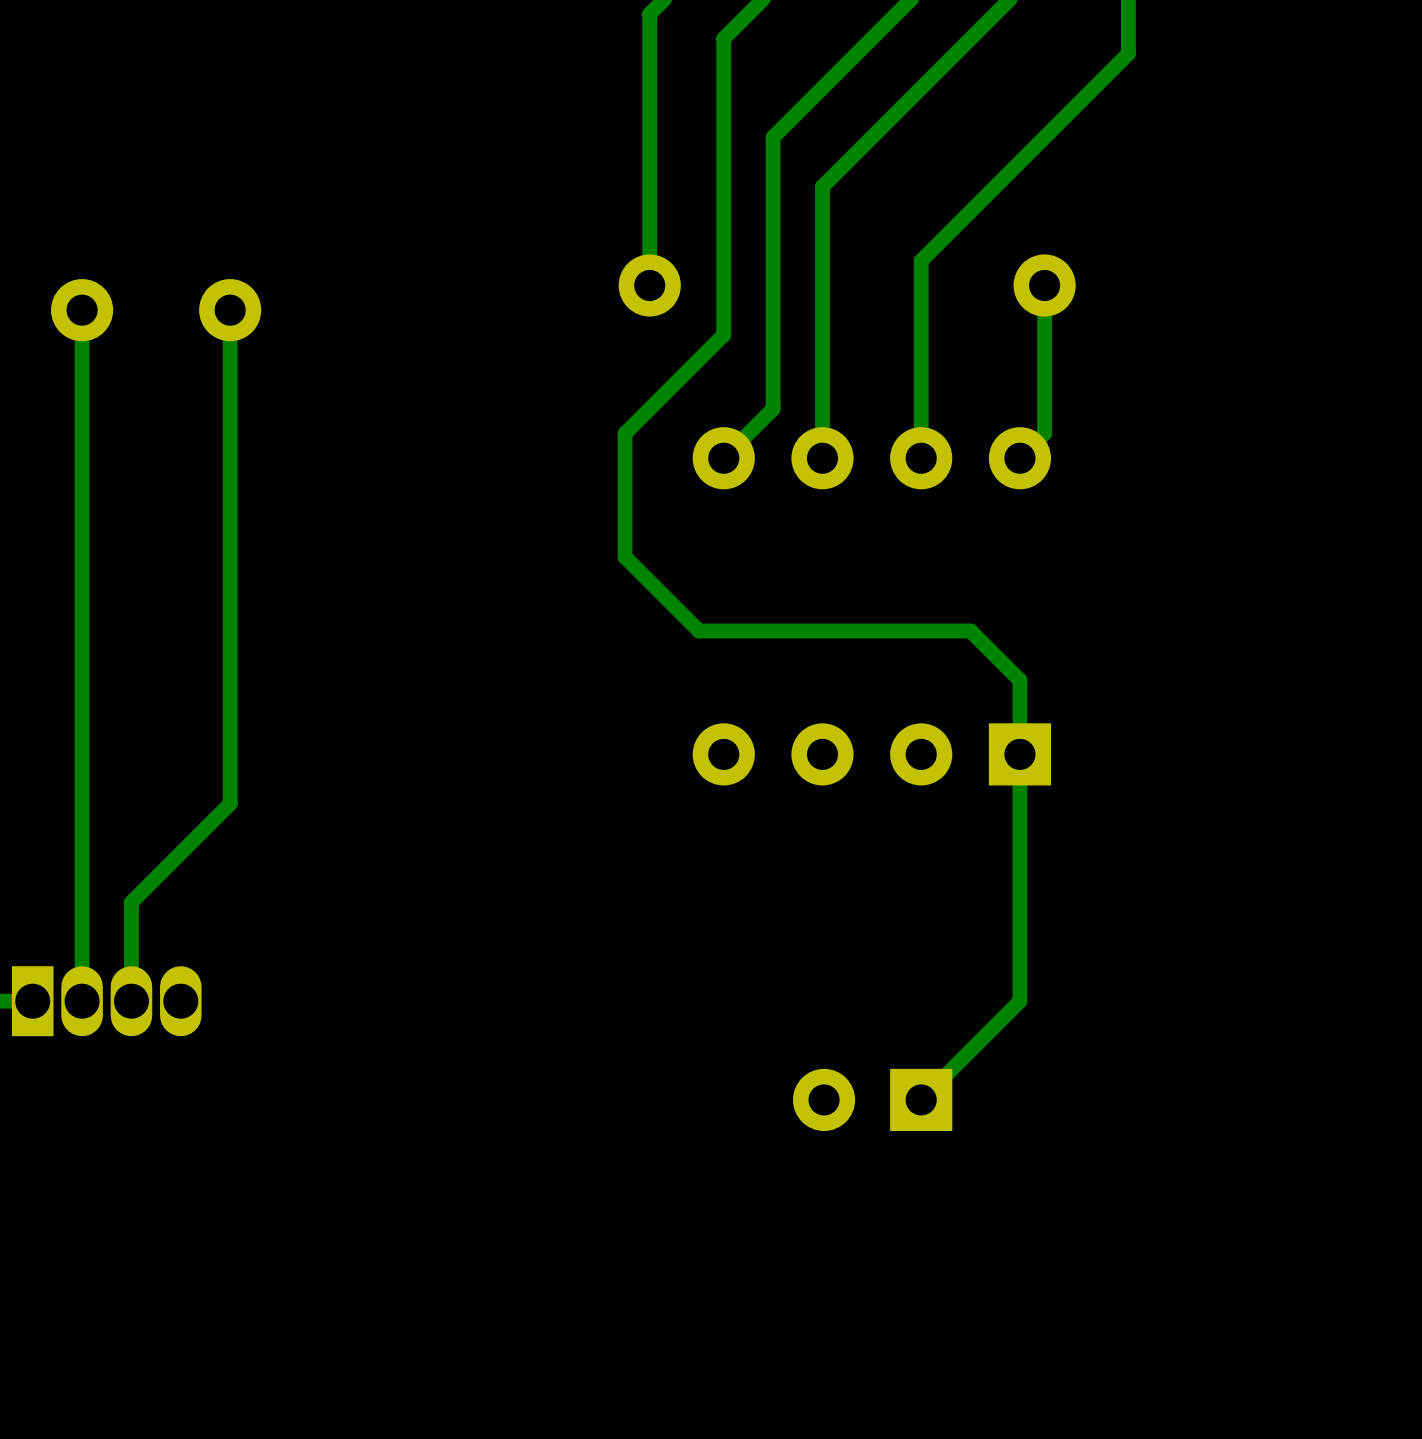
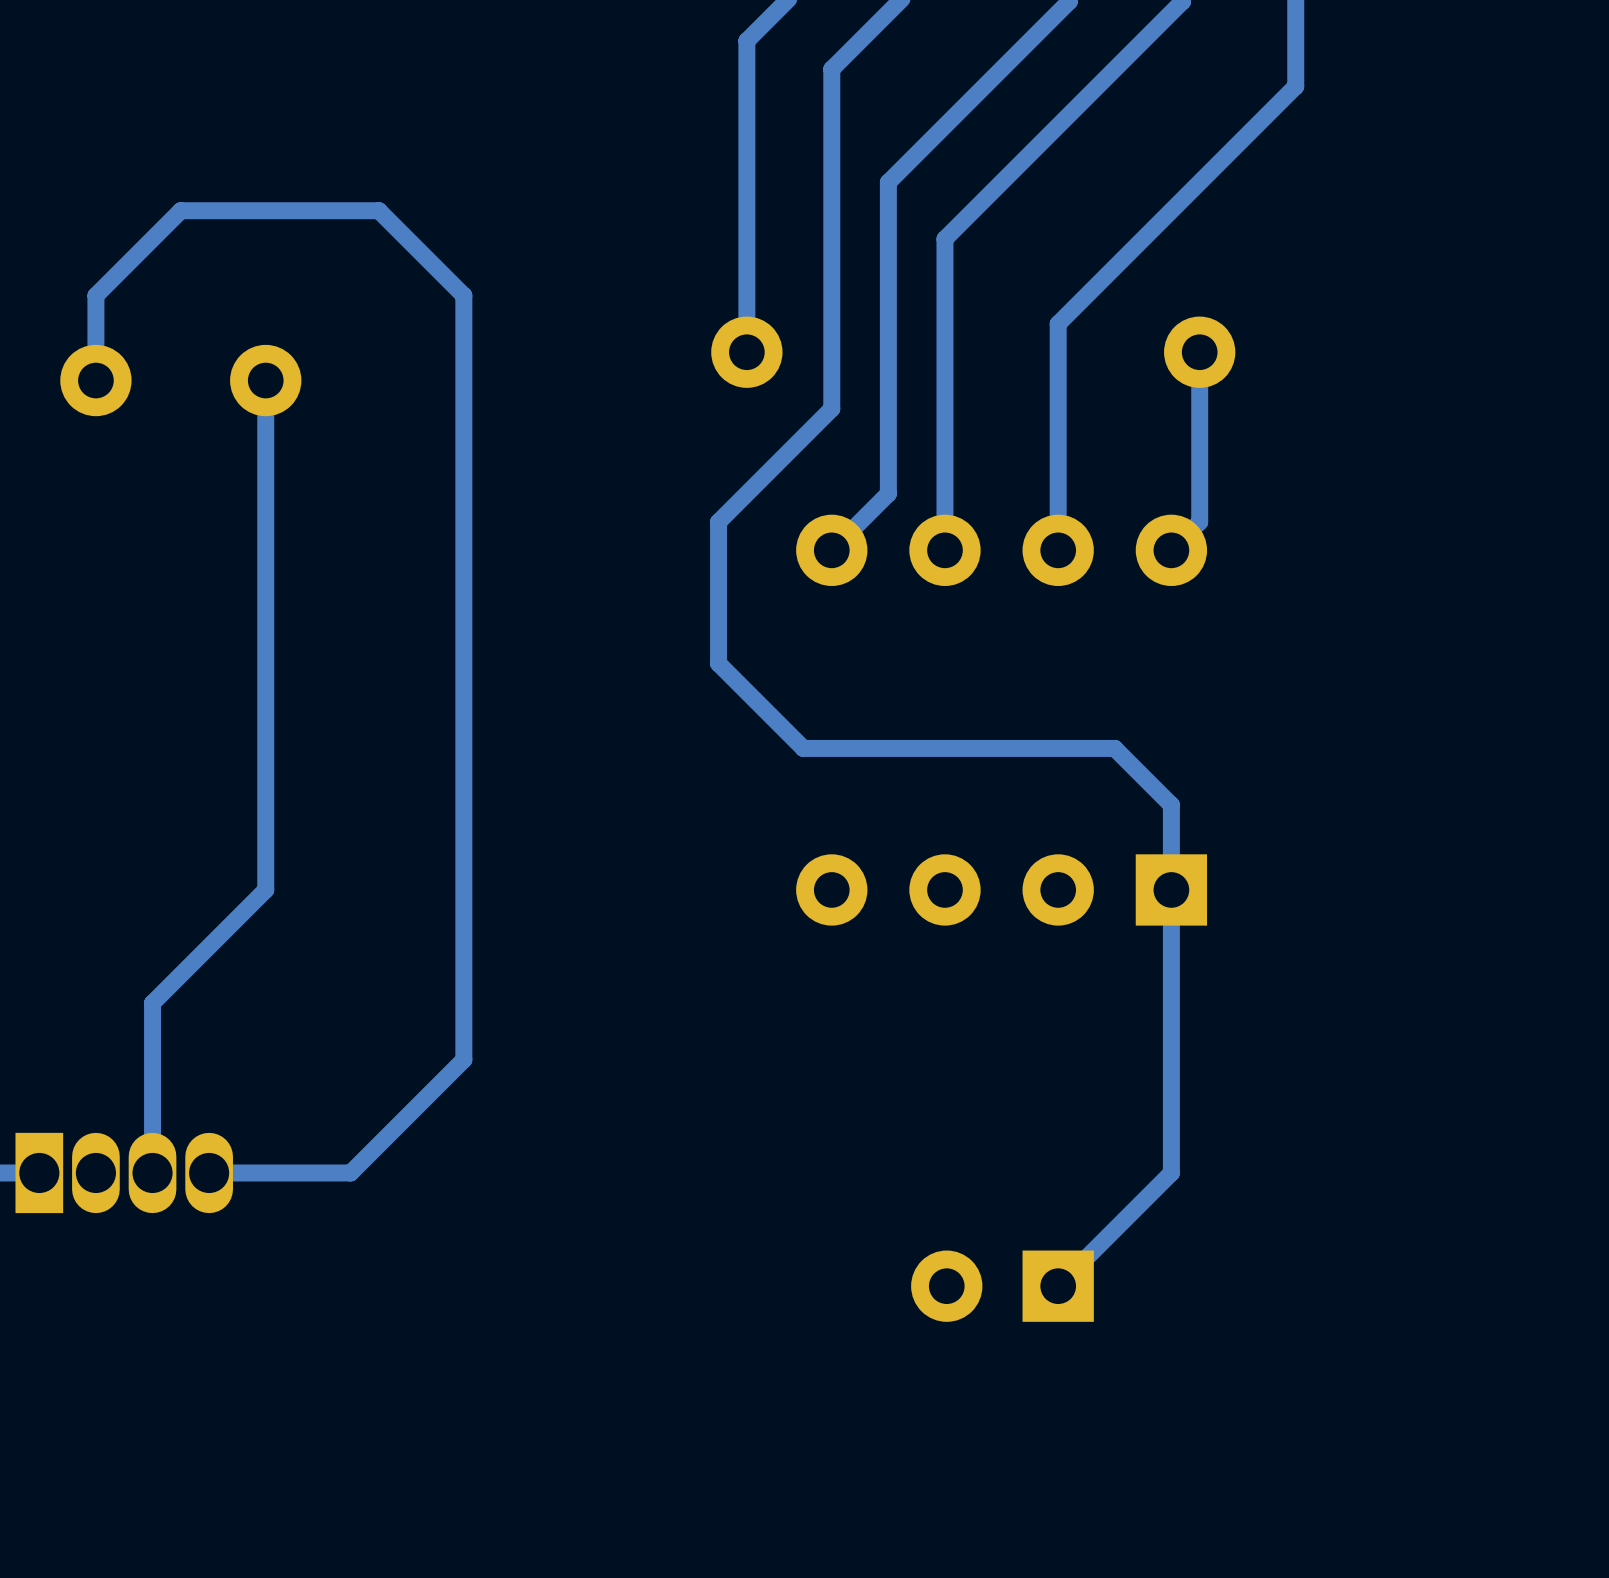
bottom track: (82, 310) (82, 1001) -> (95, 380) (95, 295) (180, 210) (378, 210) (463, 295) (463, 1059) (350, 1172) (209, 1172)
bottom track: (230, 754) (230, 803) (131, 902) -> (265, 889) (152, 1003) (152, 1059)

